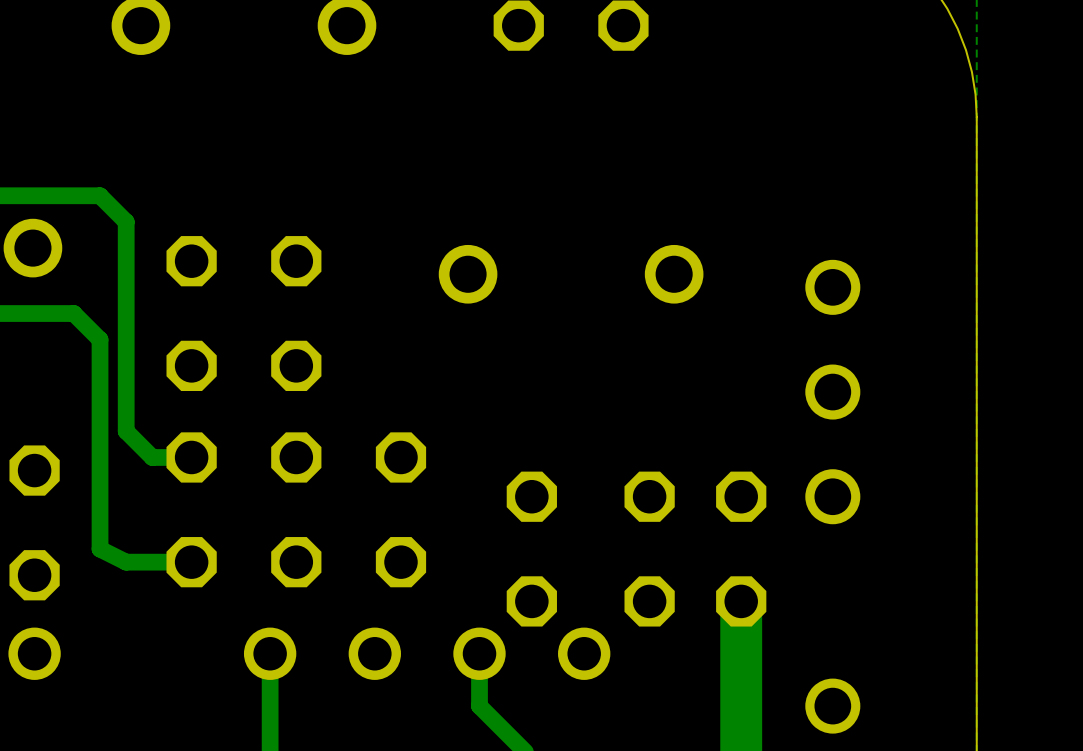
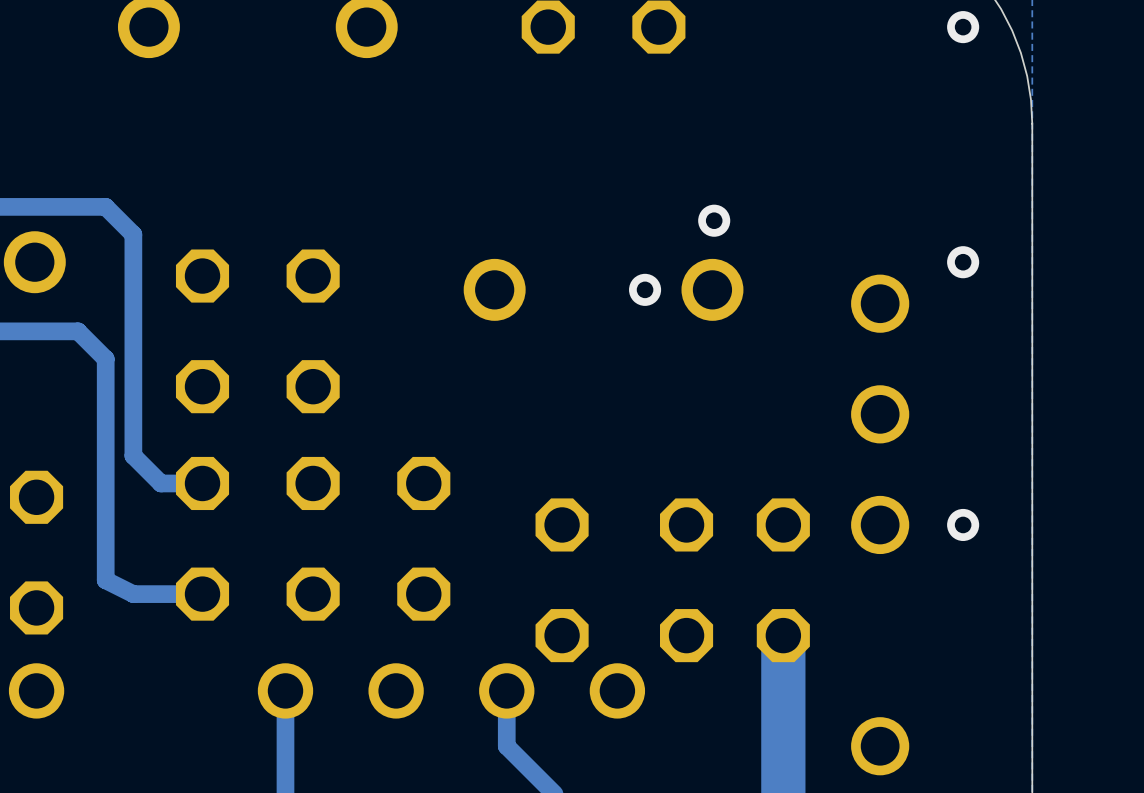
via: none -> (963, 27)
via: none -> (714, 220)
via: none -> (963, 262)
via: none -> (645, 289)
via: none -> (963, 524)

